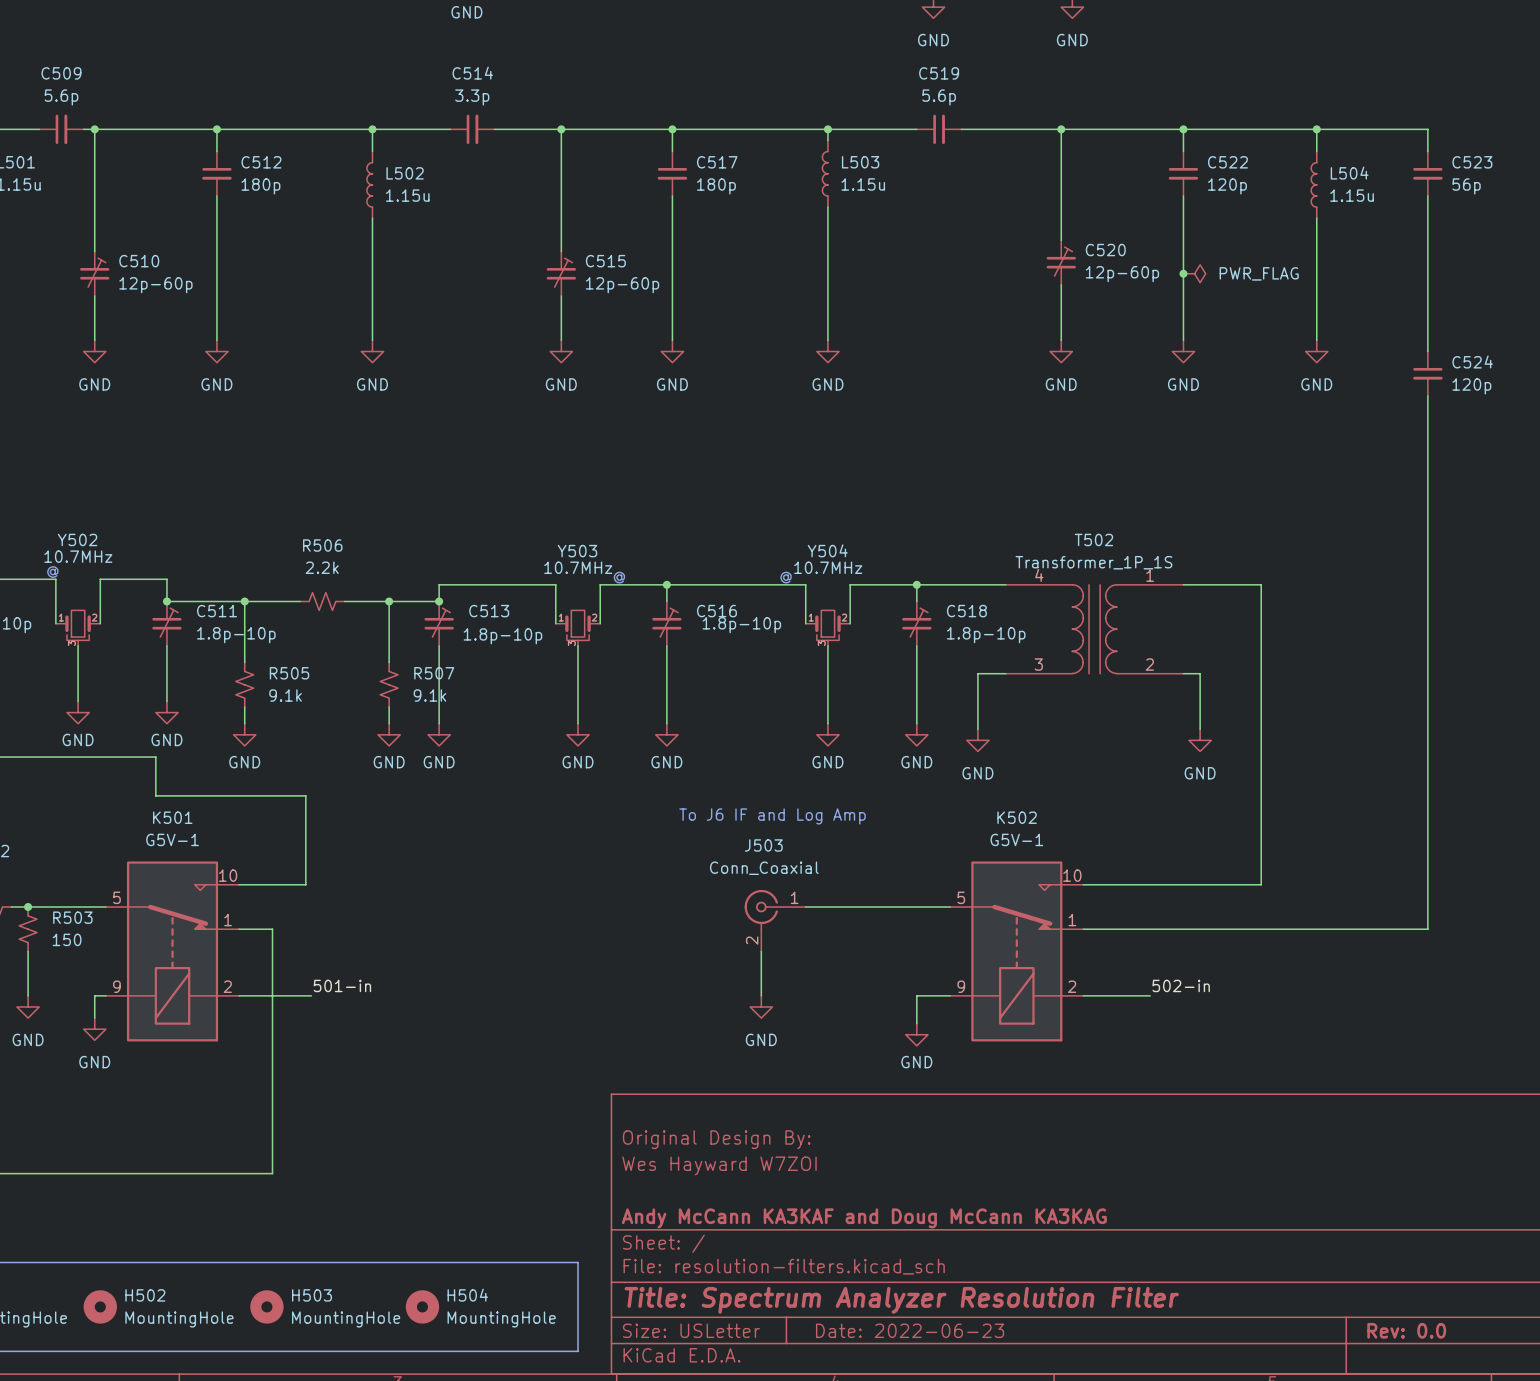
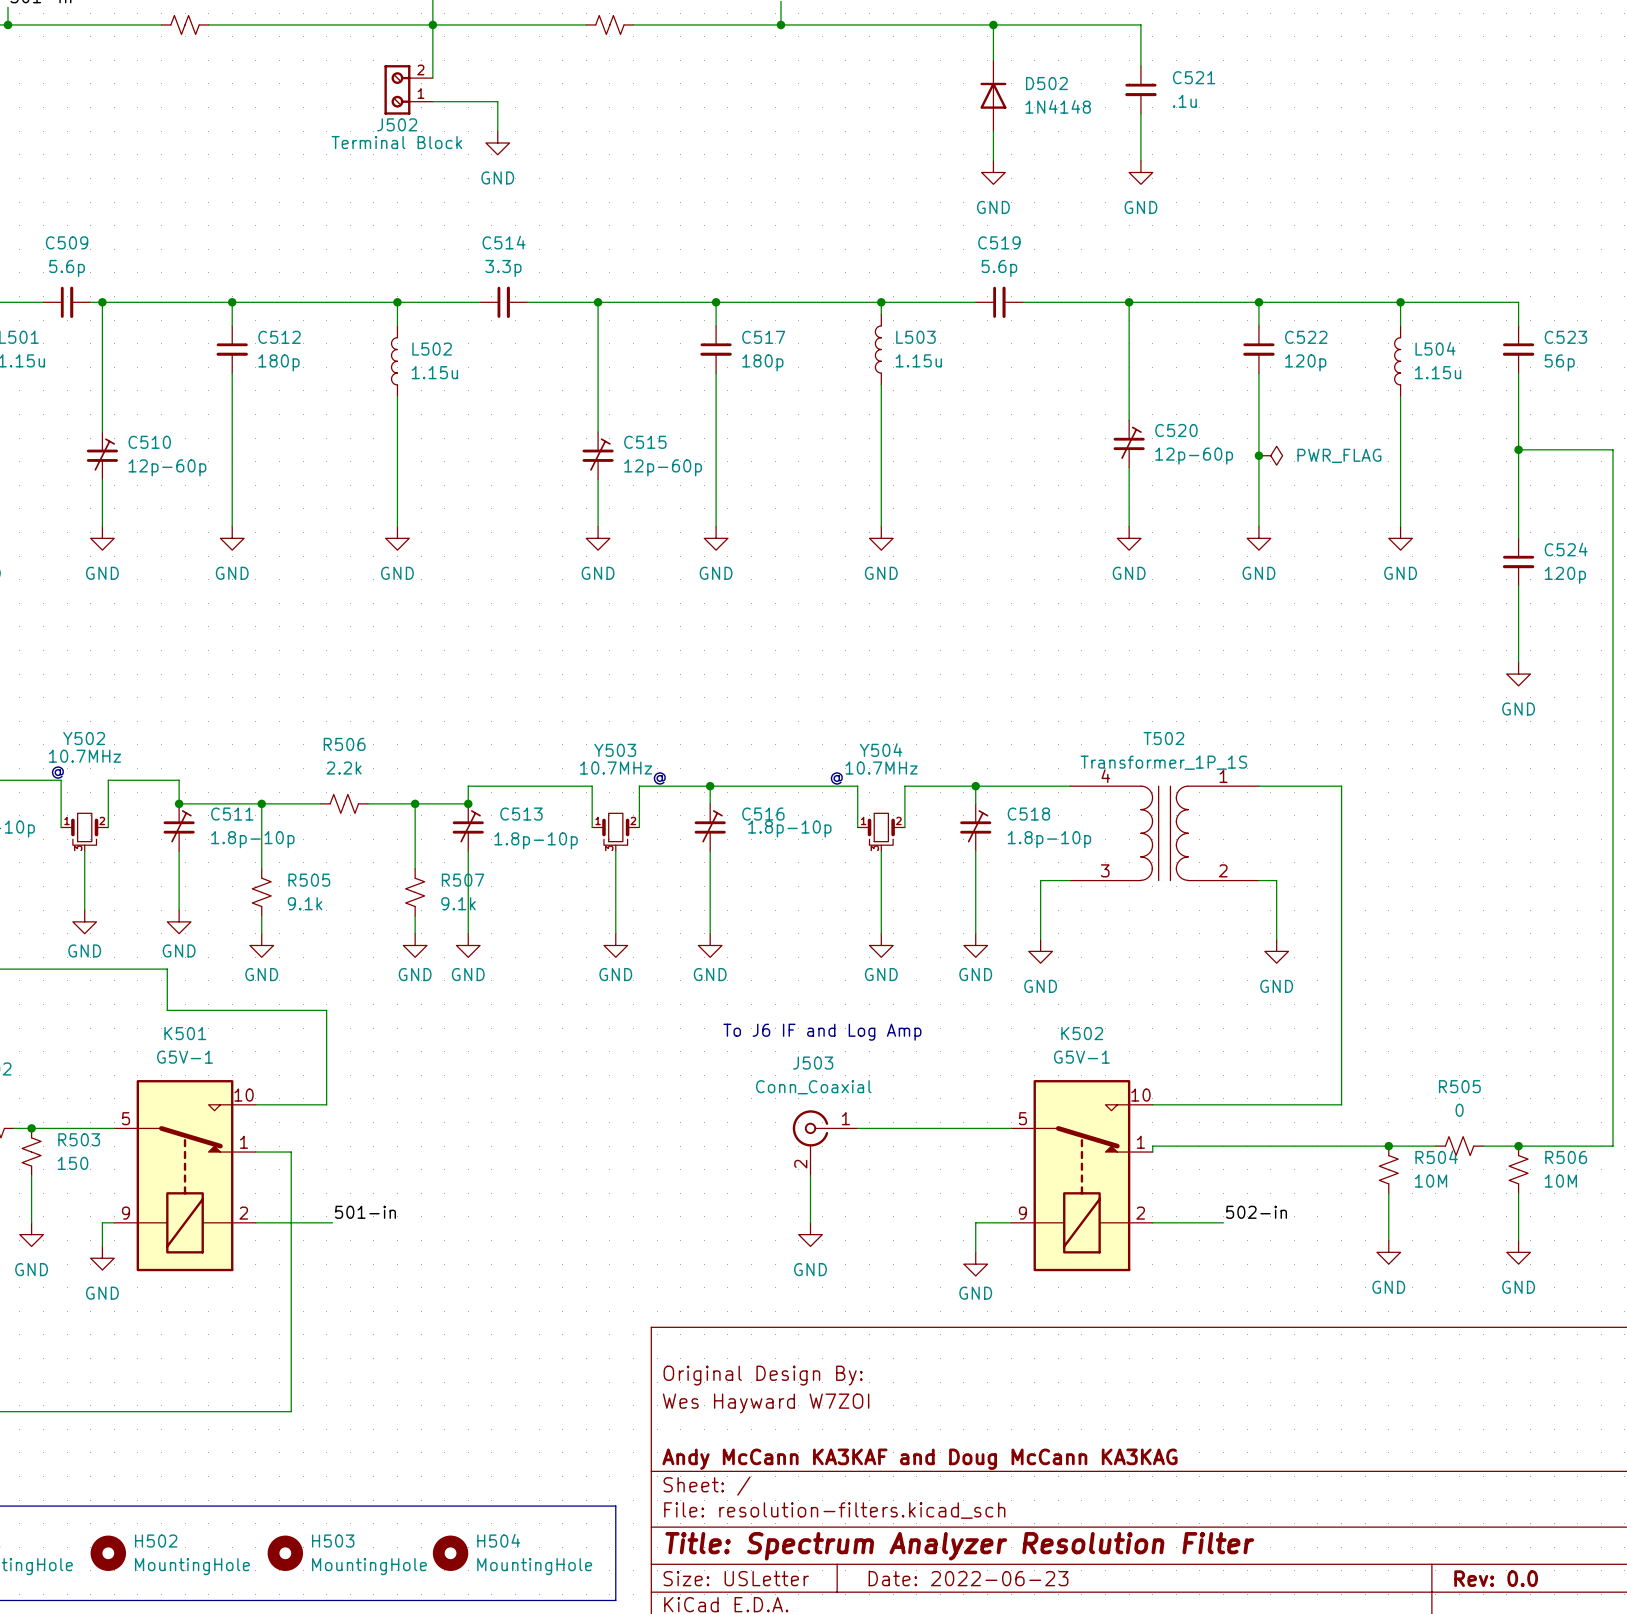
wire: none -> (1518, 449) (1613, 449) (1613, 1146) (1483, 1146)
junction: none -> (1518, 449)
wire: (1427, 468) (1427, 929) (1083, 929) -> (1435, 1146) (1152, 1146) (1152, 1152)
power symbol: none -> GND (1518, 674)
junction: none -> (1388, 1146)
R505: none -> 0 (1459, 1146)
junction: none -> (1518, 1146)
R504: none -> 10M (1388, 1169)
R506: none -> 10M (1518, 1169)
wire: none -> (1388, 1193) (1388, 1240)
wire: none -> (1518, 1193) (1518, 1240)
power symbol: none -> GND (1388, 1252)
power symbol: none -> GND (1518, 1252)

